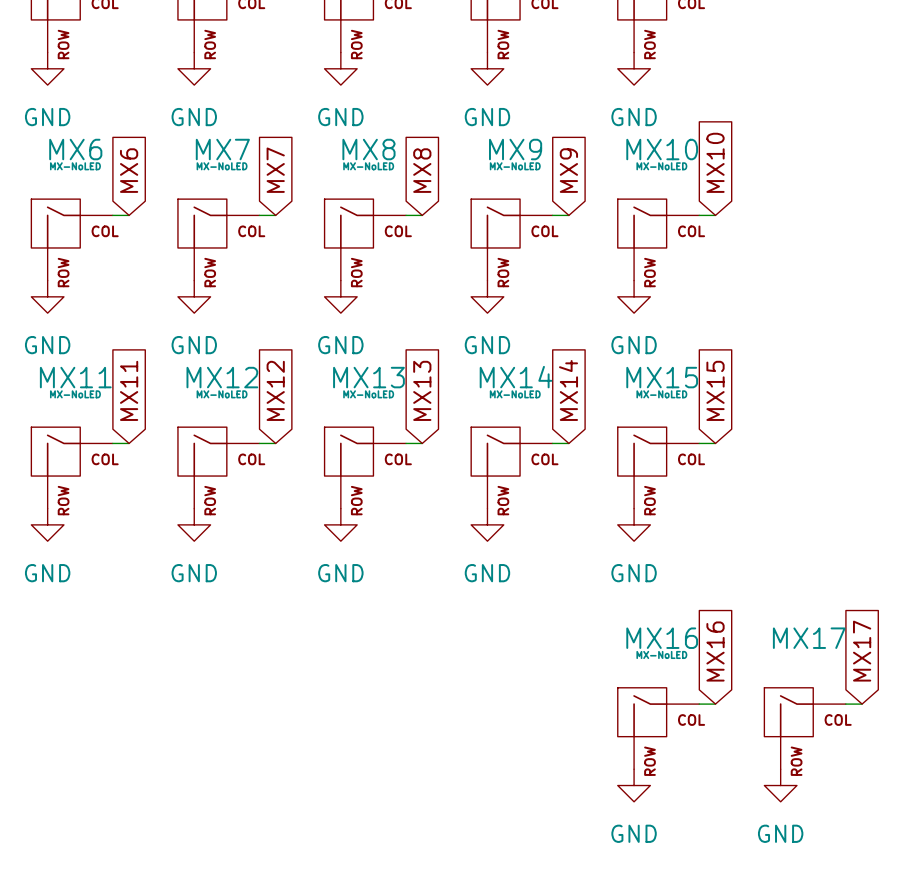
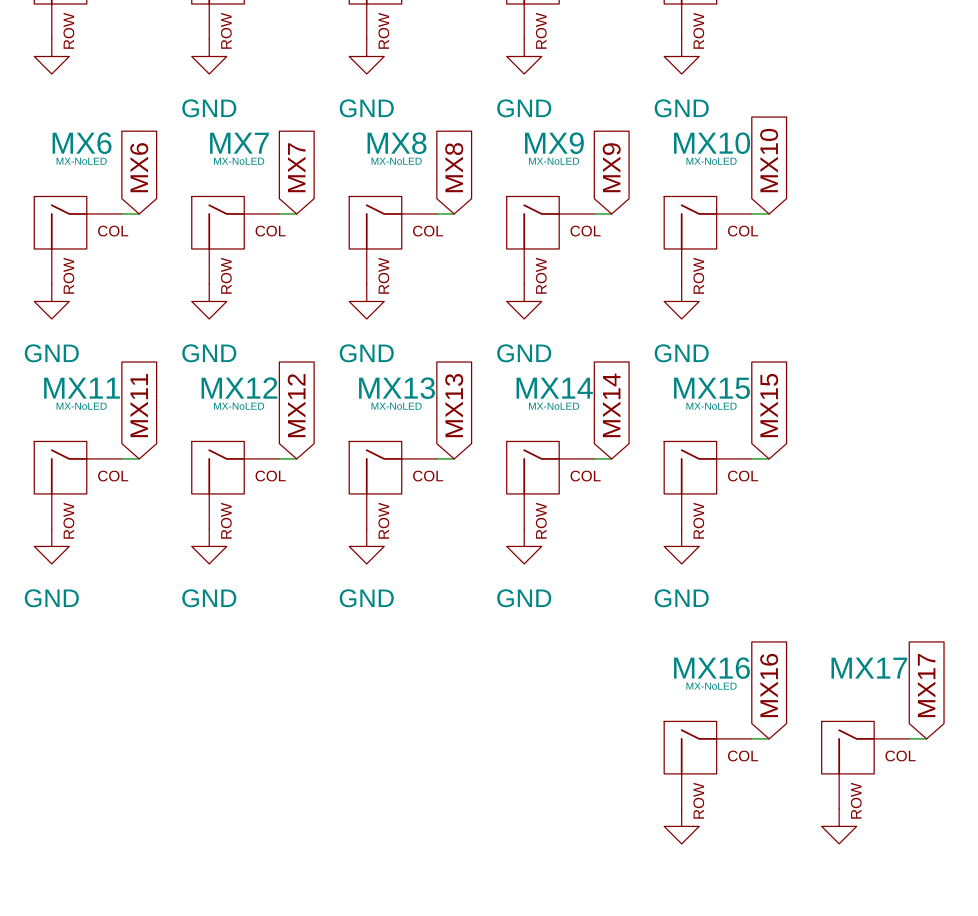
power symbol text: GND (47, 117) -> none
power symbol text: GND (634, 833) -> none
power symbol text: GND (780, 833) -> none

